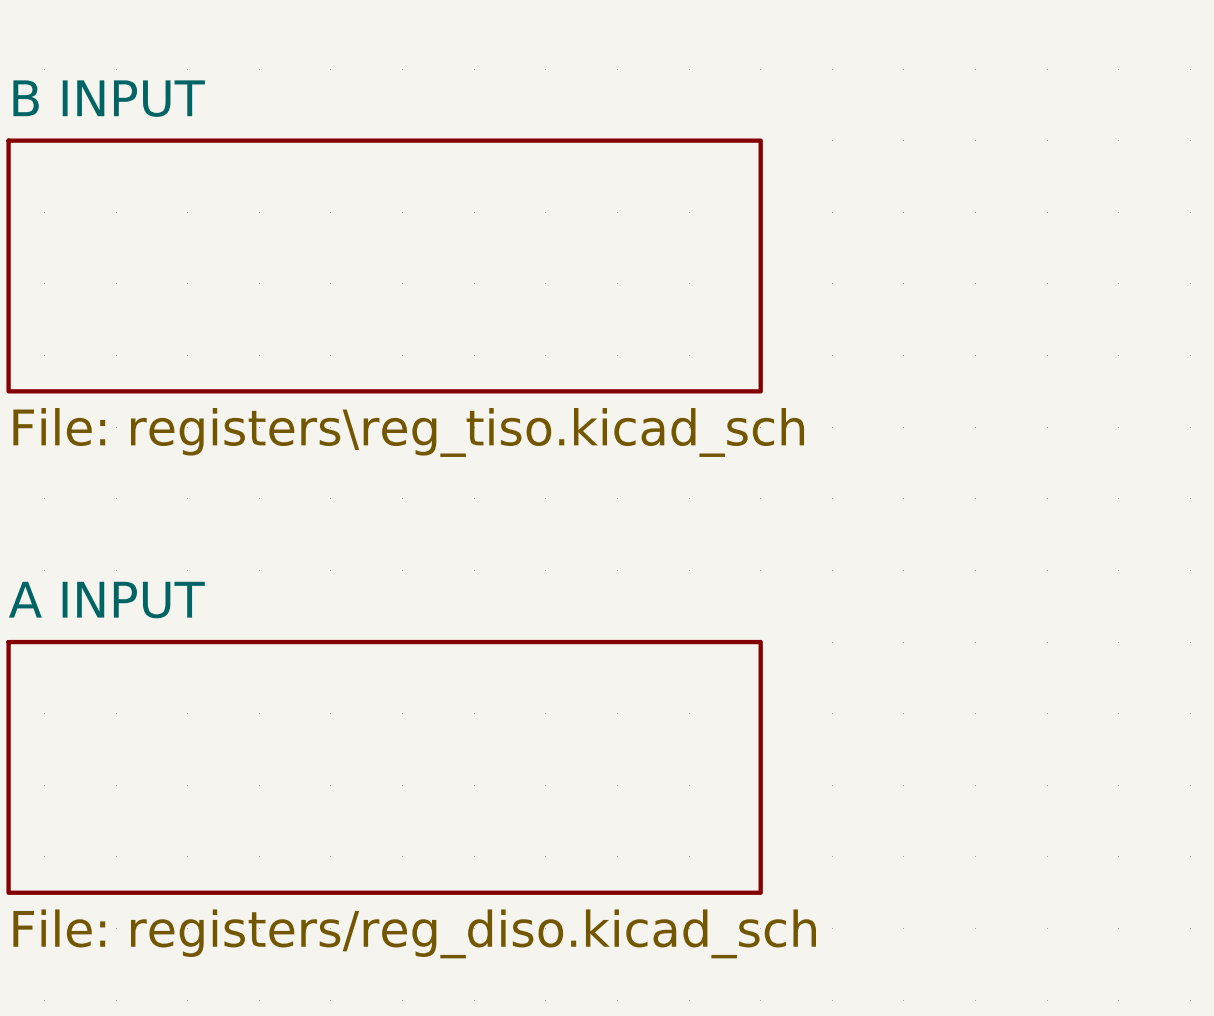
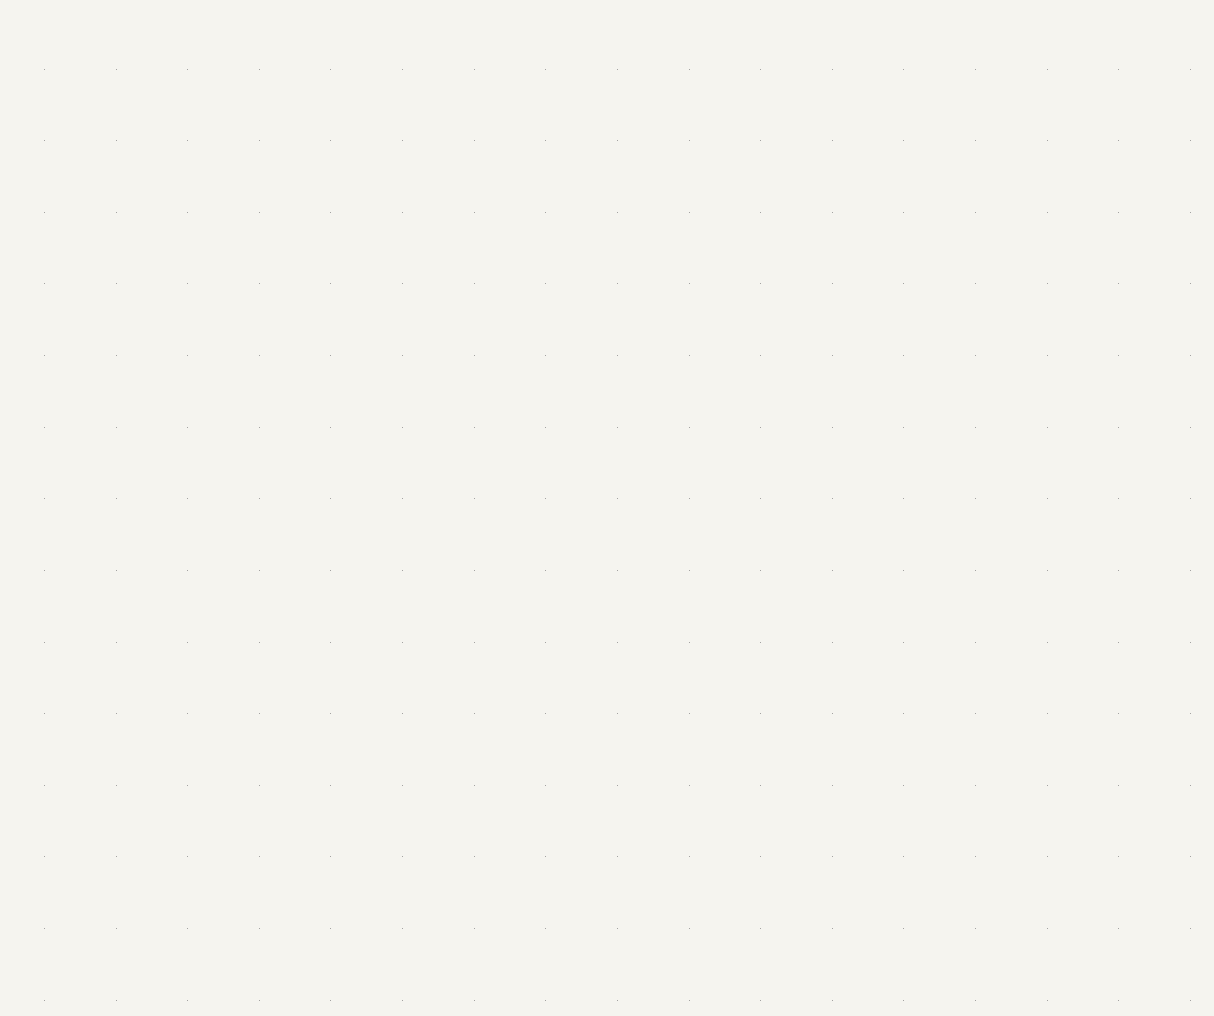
sheet B INPUT: File: registers\reg_tiso.kicad_sch (384, 265) -> none
sheet A INPUT: File: registers/reg_diso.kicad_sch (384, 767) -> none

